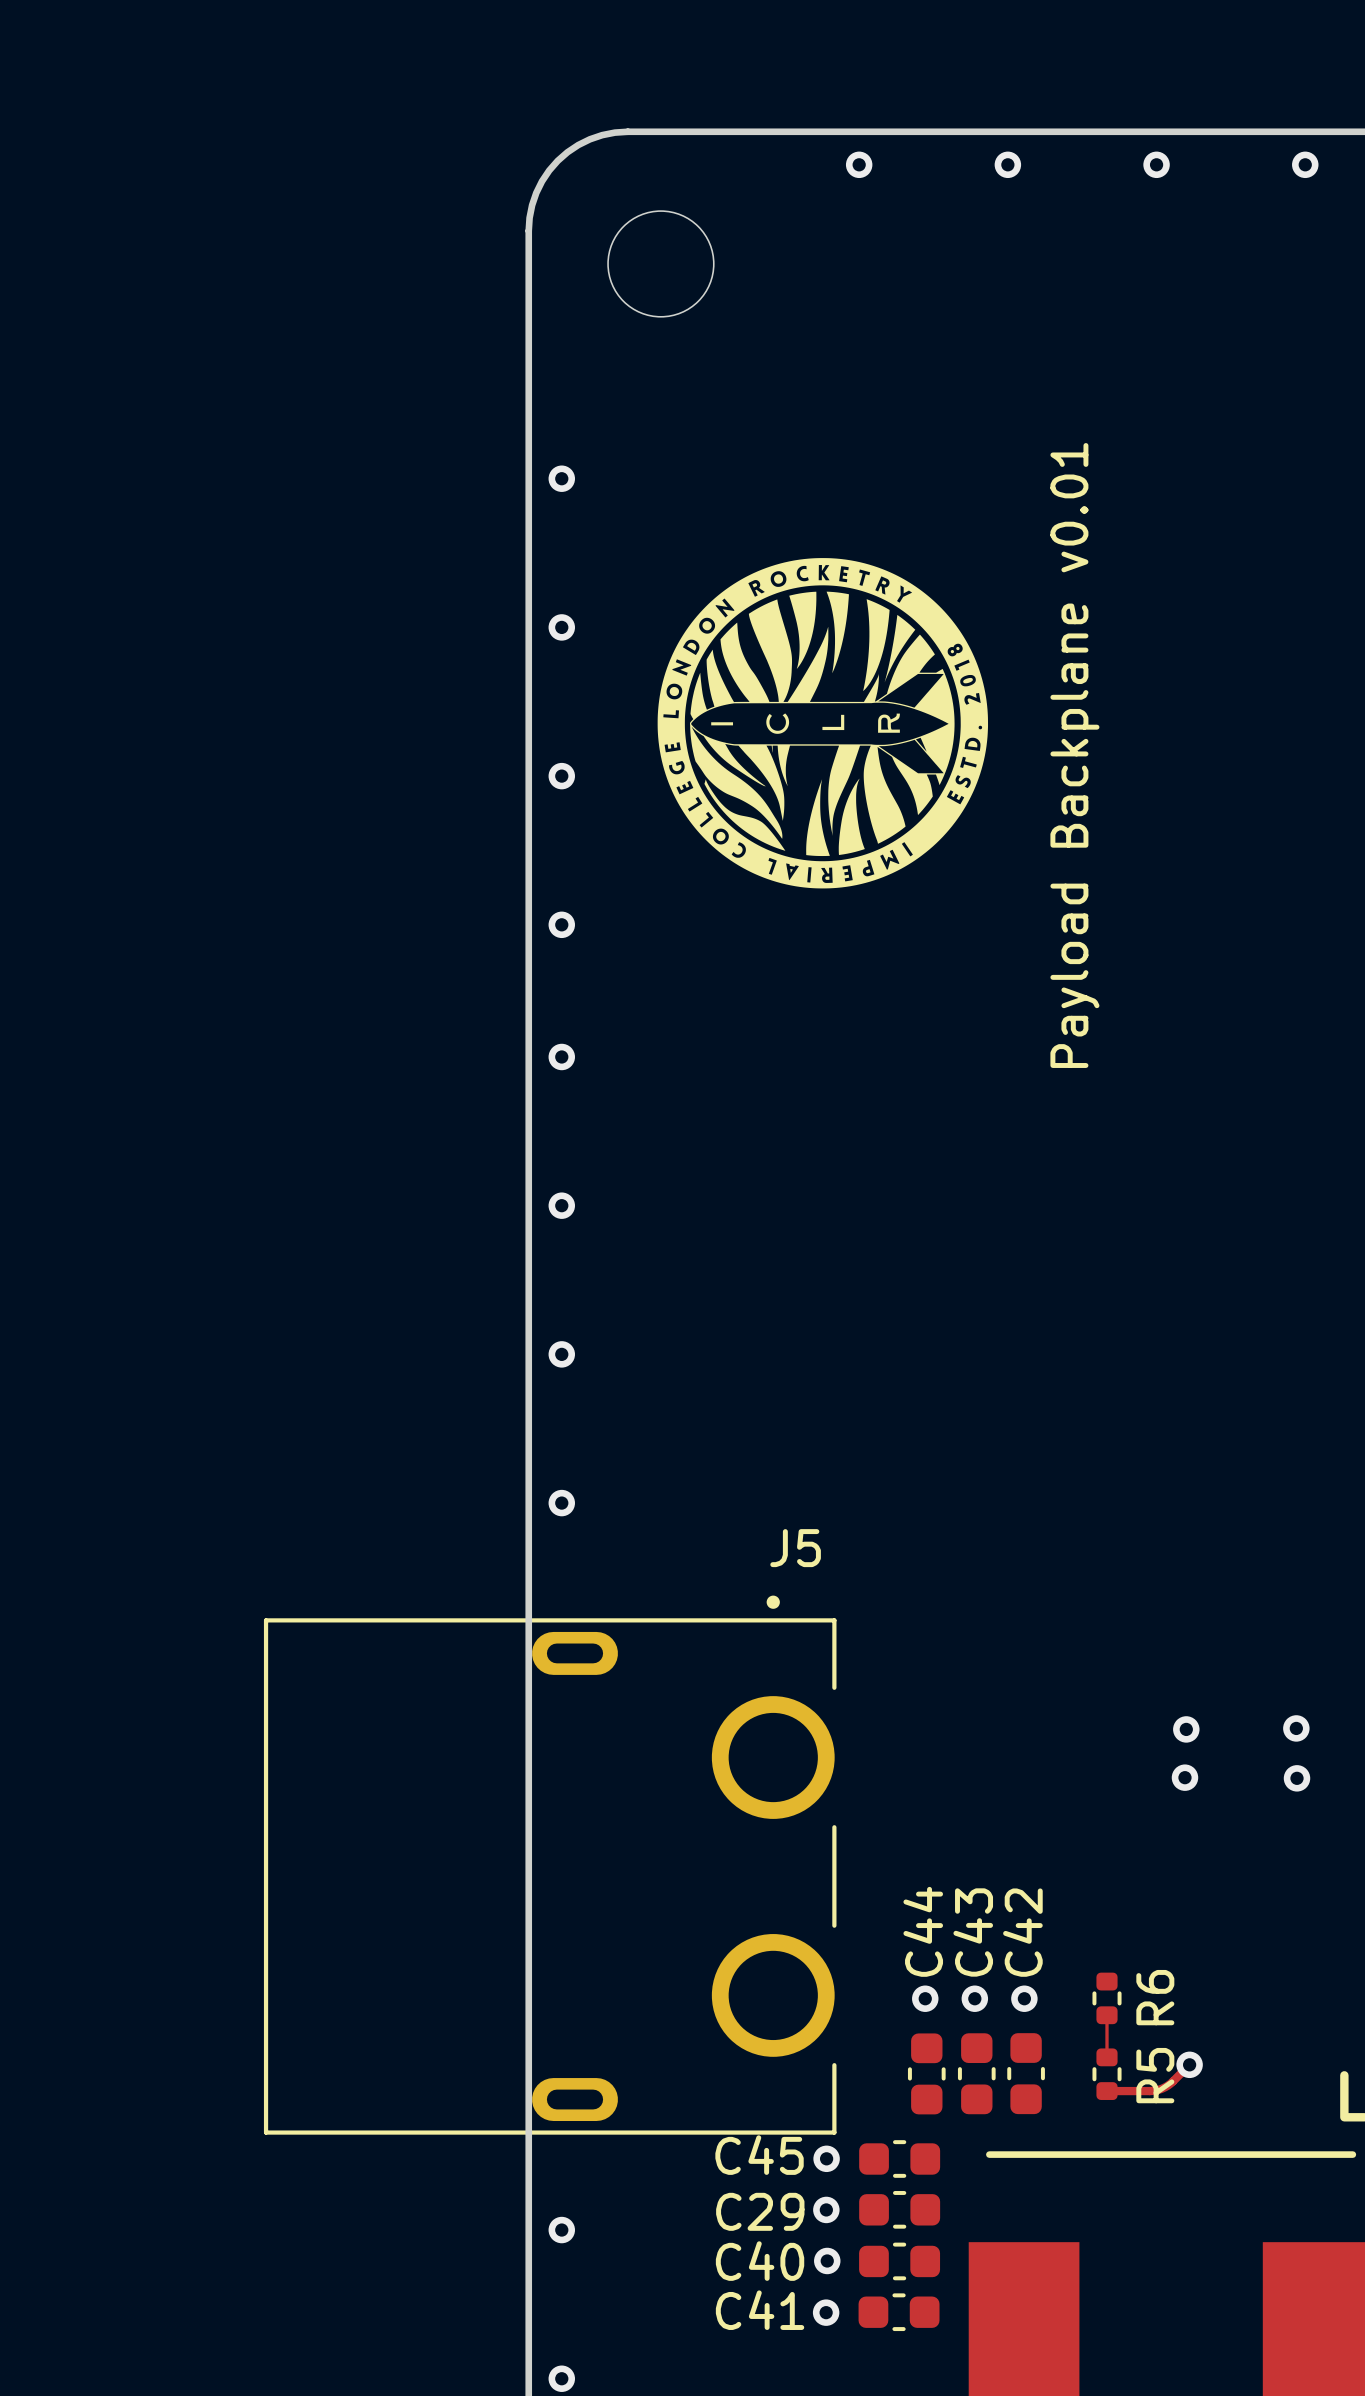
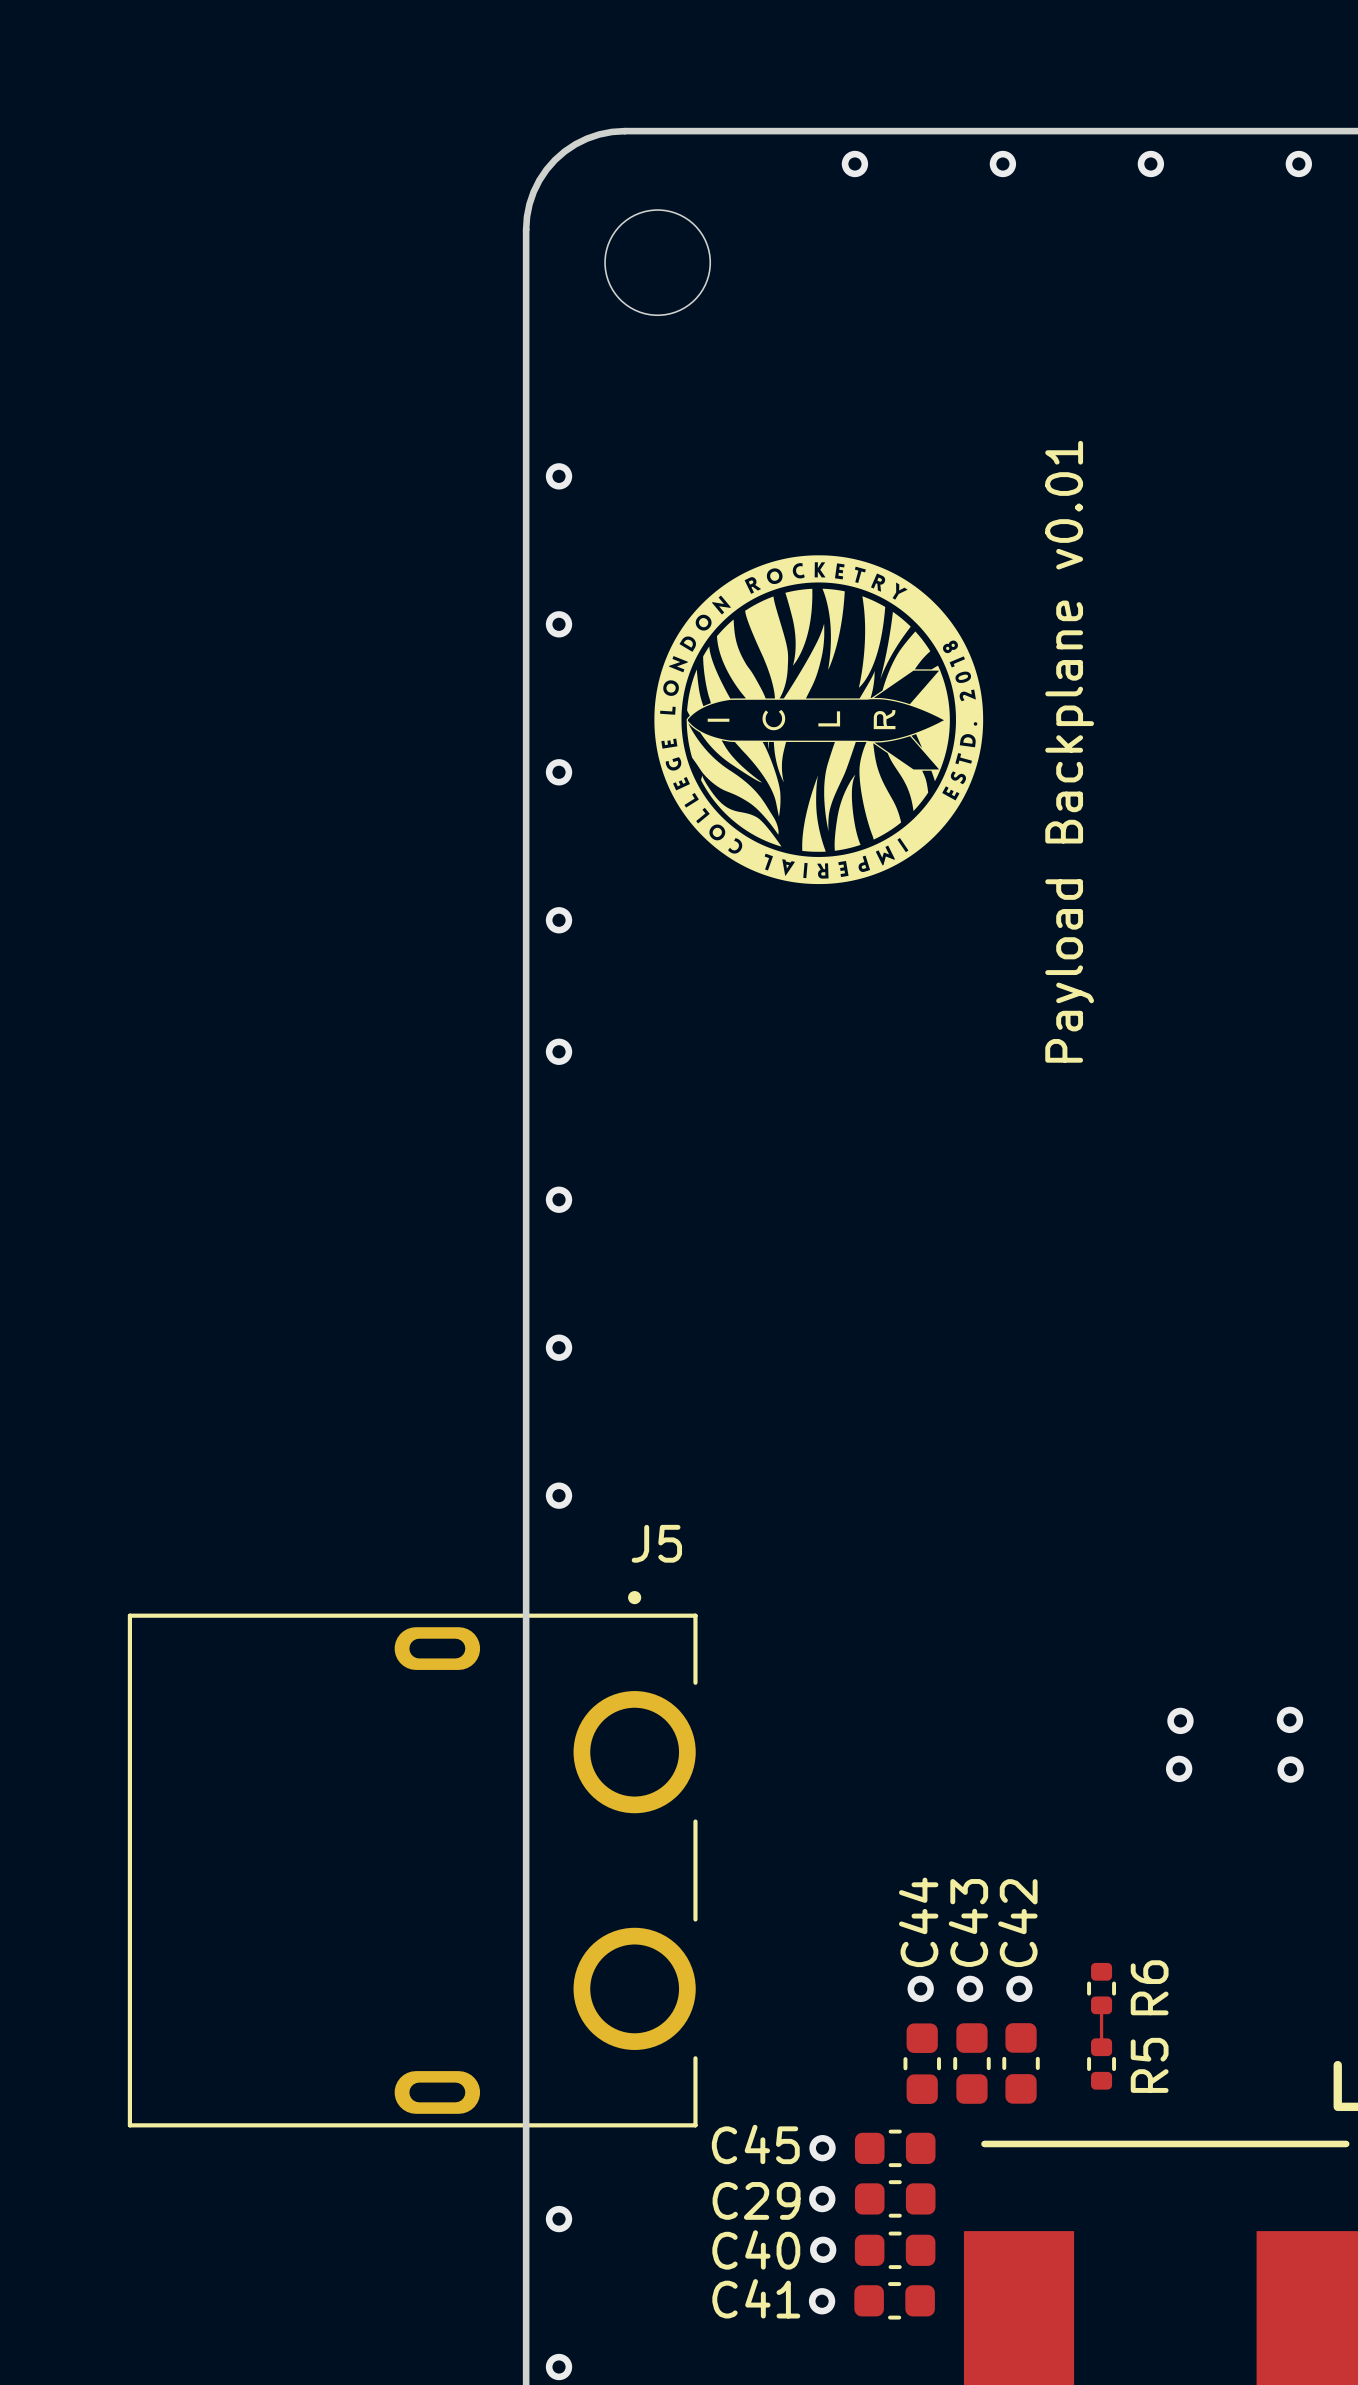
J5 position: (550, 1865) -> (412, 1859)
track: (1189, 2064) (1170, 2083) (1159, 2089) (1107, 2091) -> none
via: (1189, 2064) -> none

